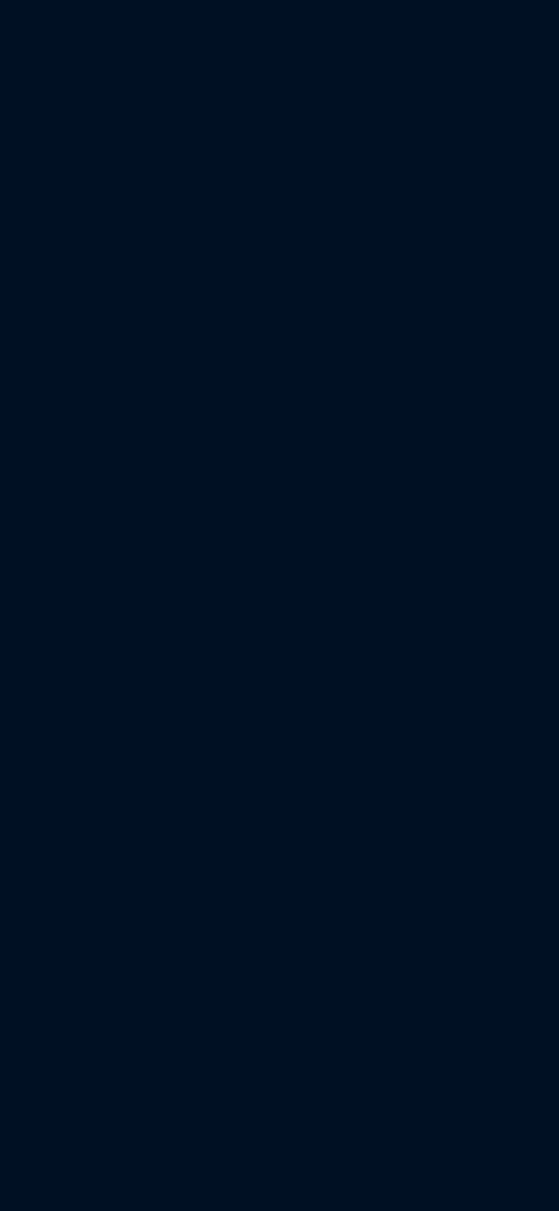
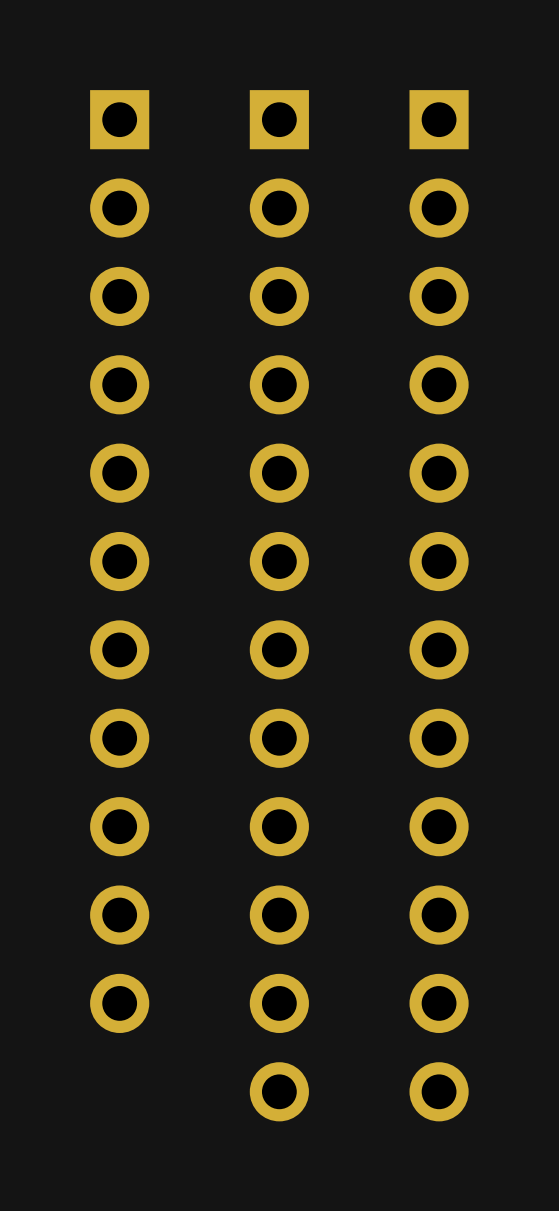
part: none -> (119, 561)
part: none -> (279, 605)
part: none -> (439, 605)

